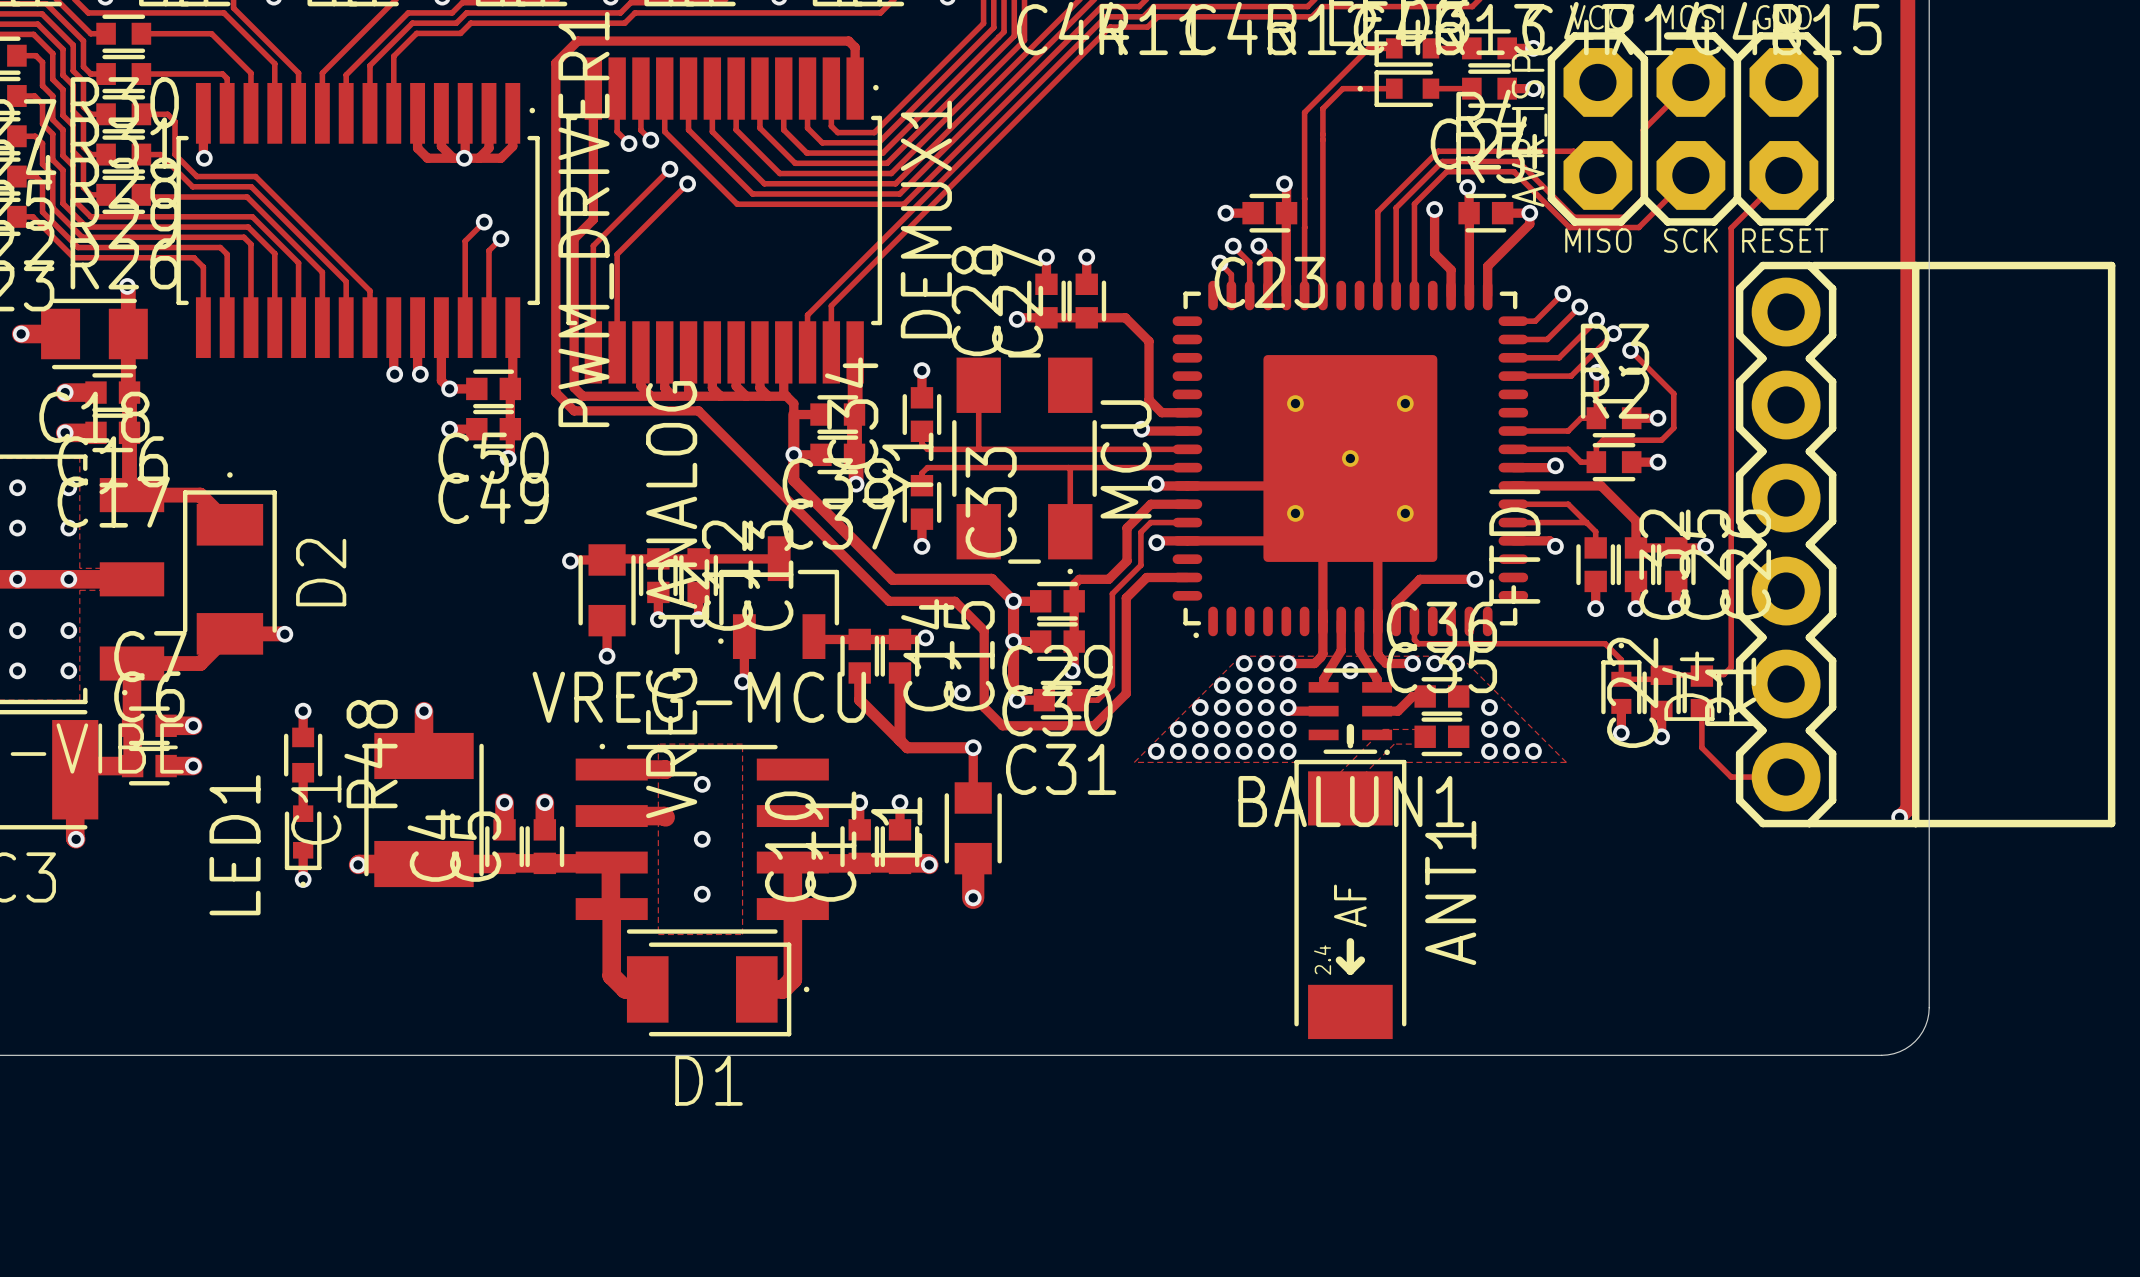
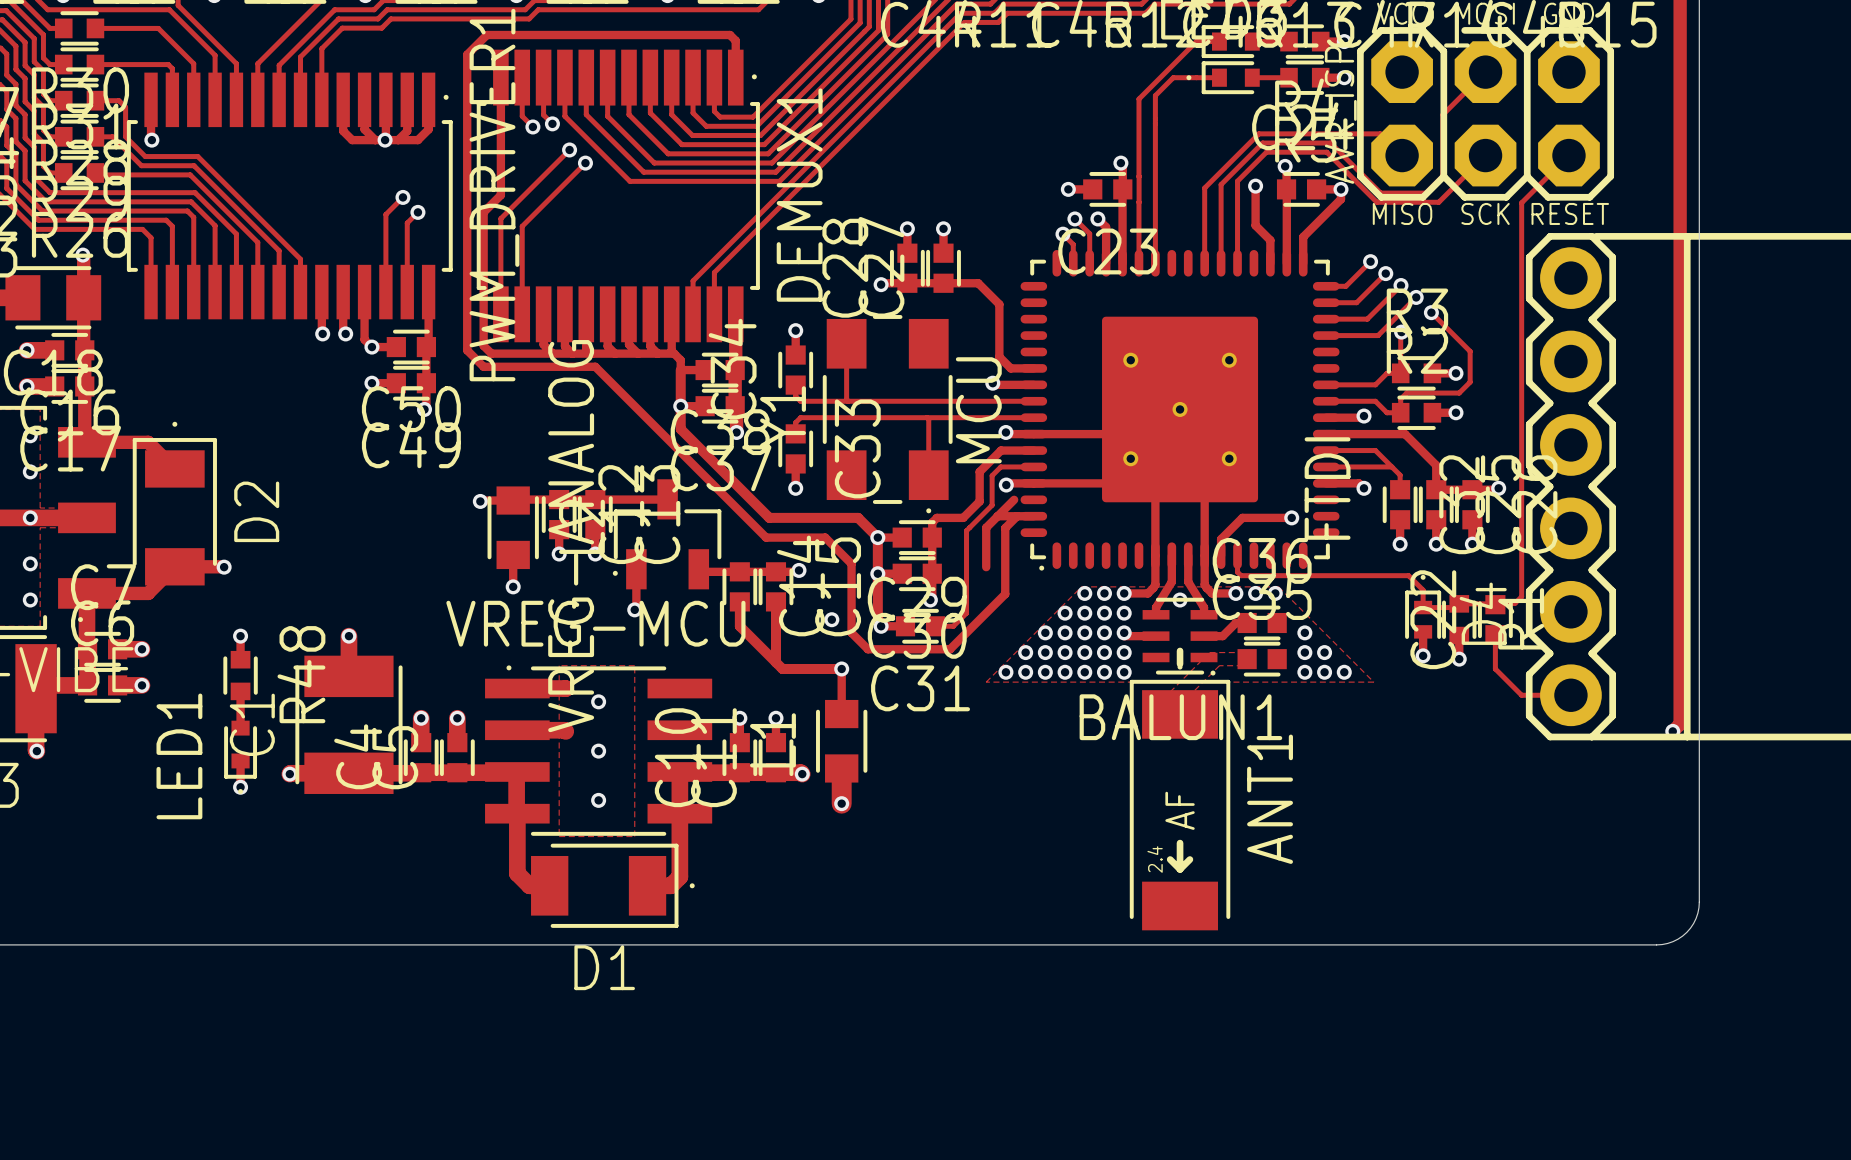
track: (1134, 590) (1126, 598) (1126, 693) -> (1017, 516) (1005, 528) (1005, 594) (978, 620)
track: none -> (986, 527) (986, 567)

